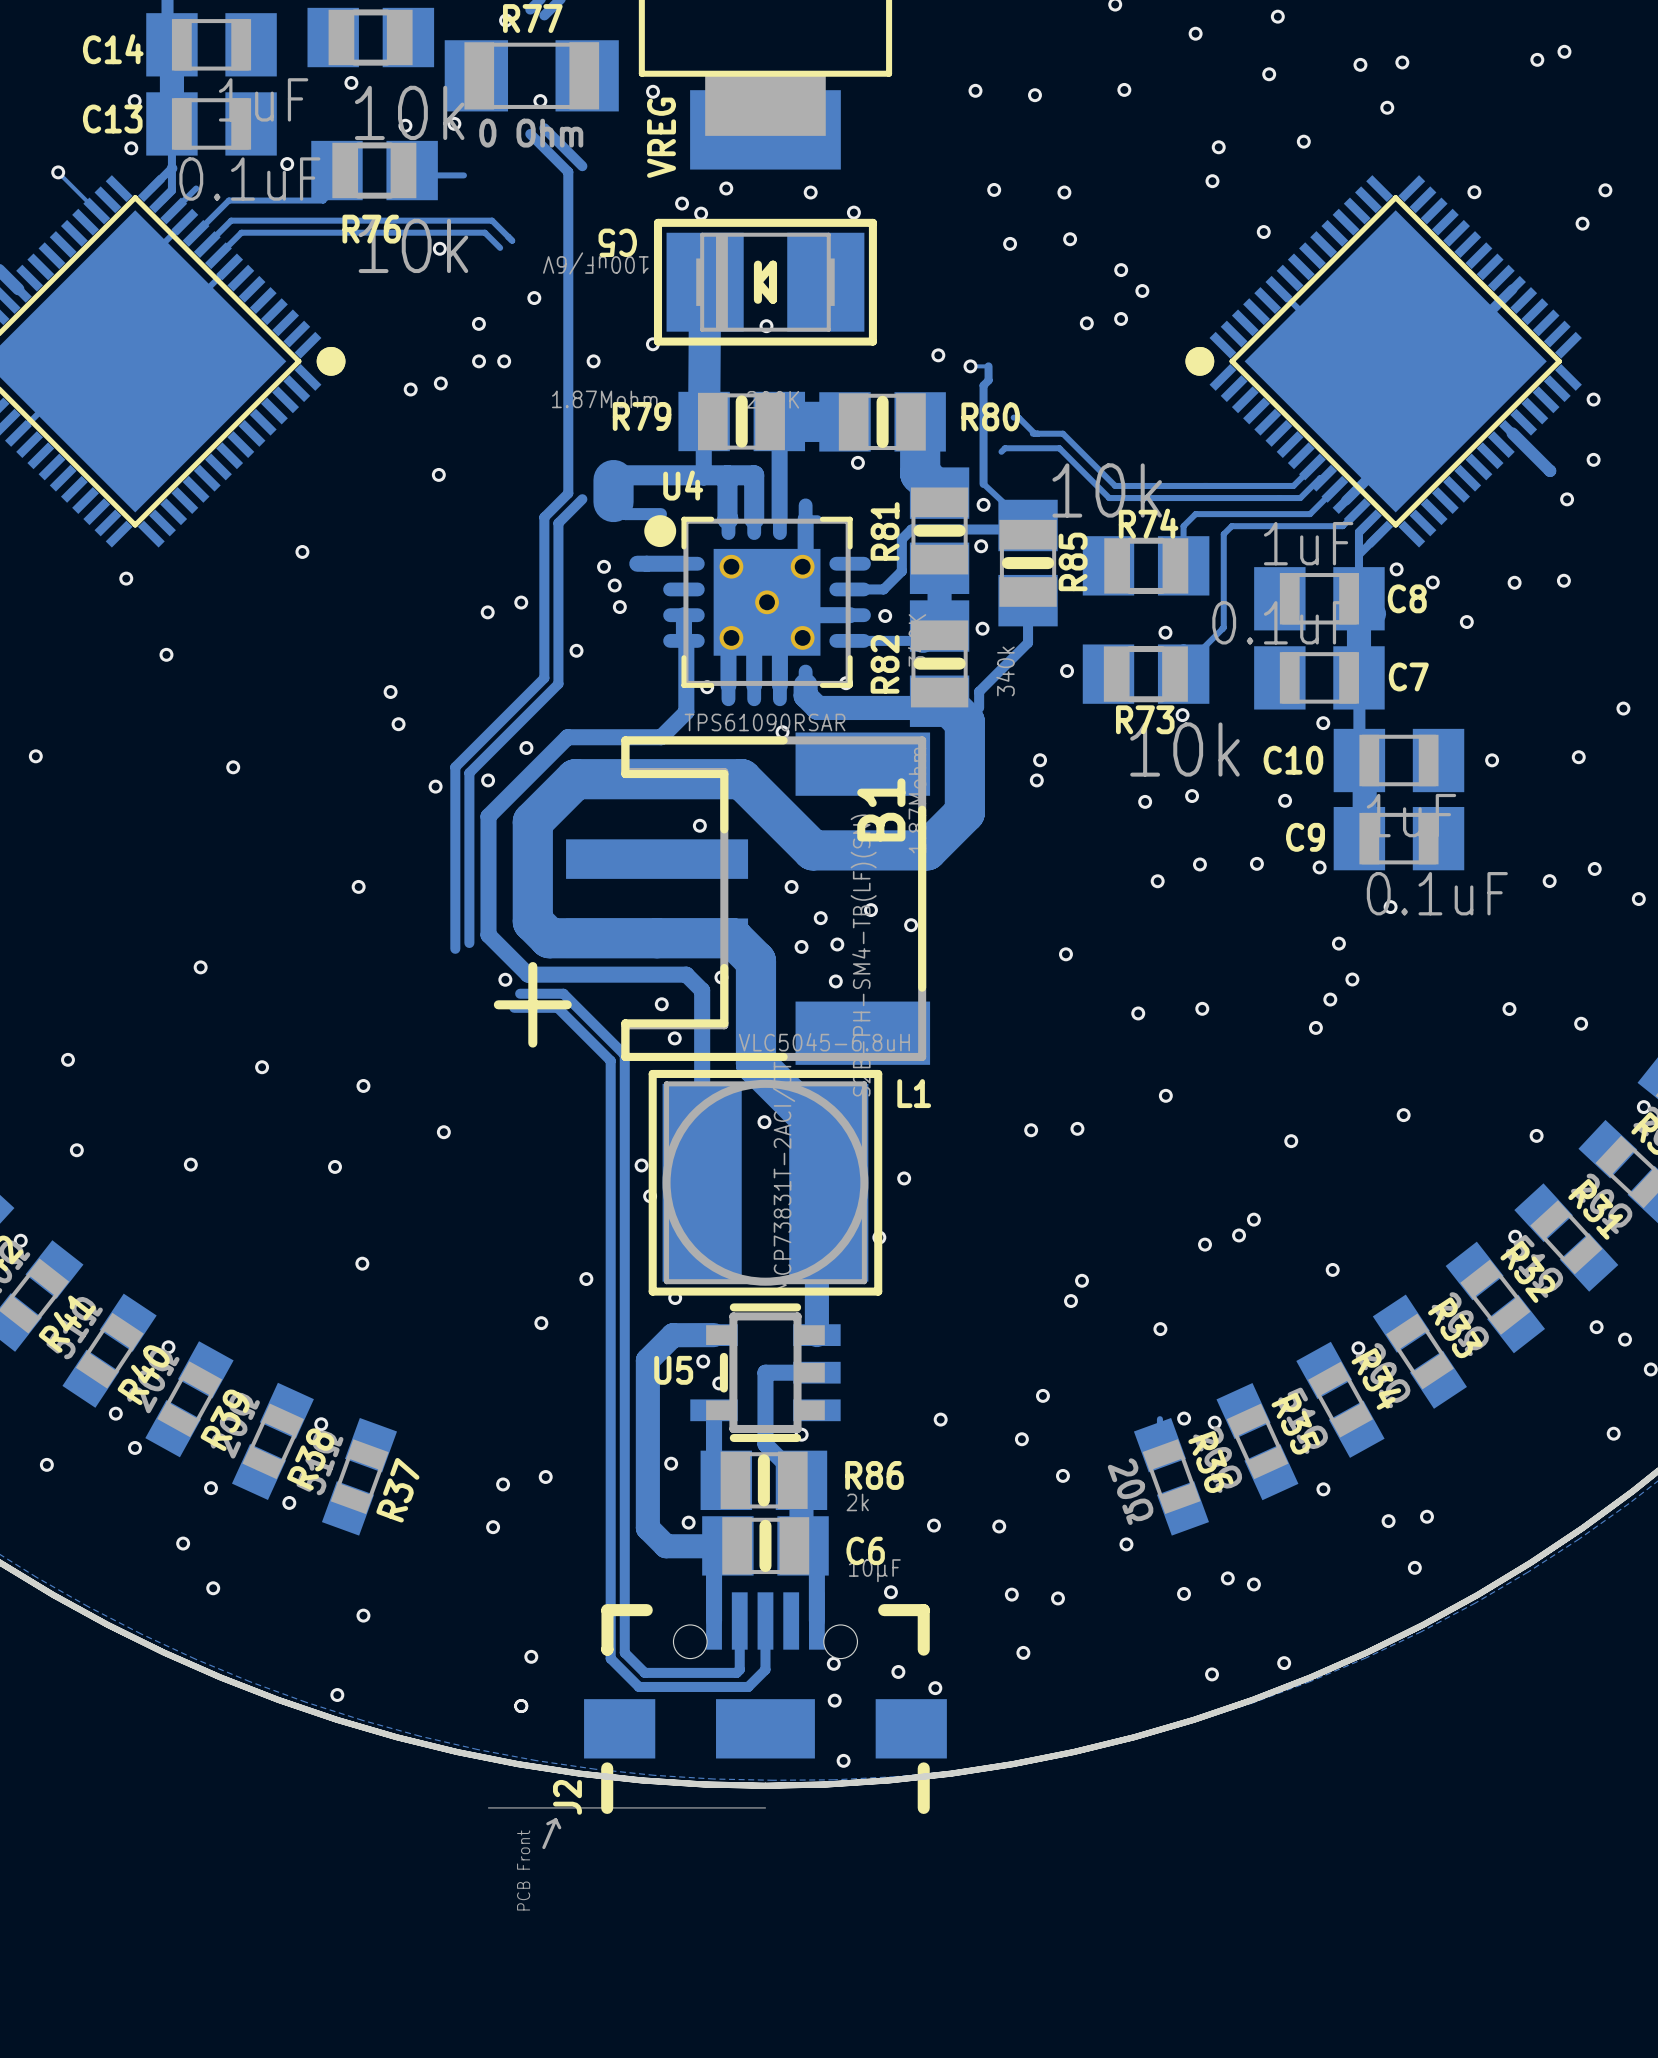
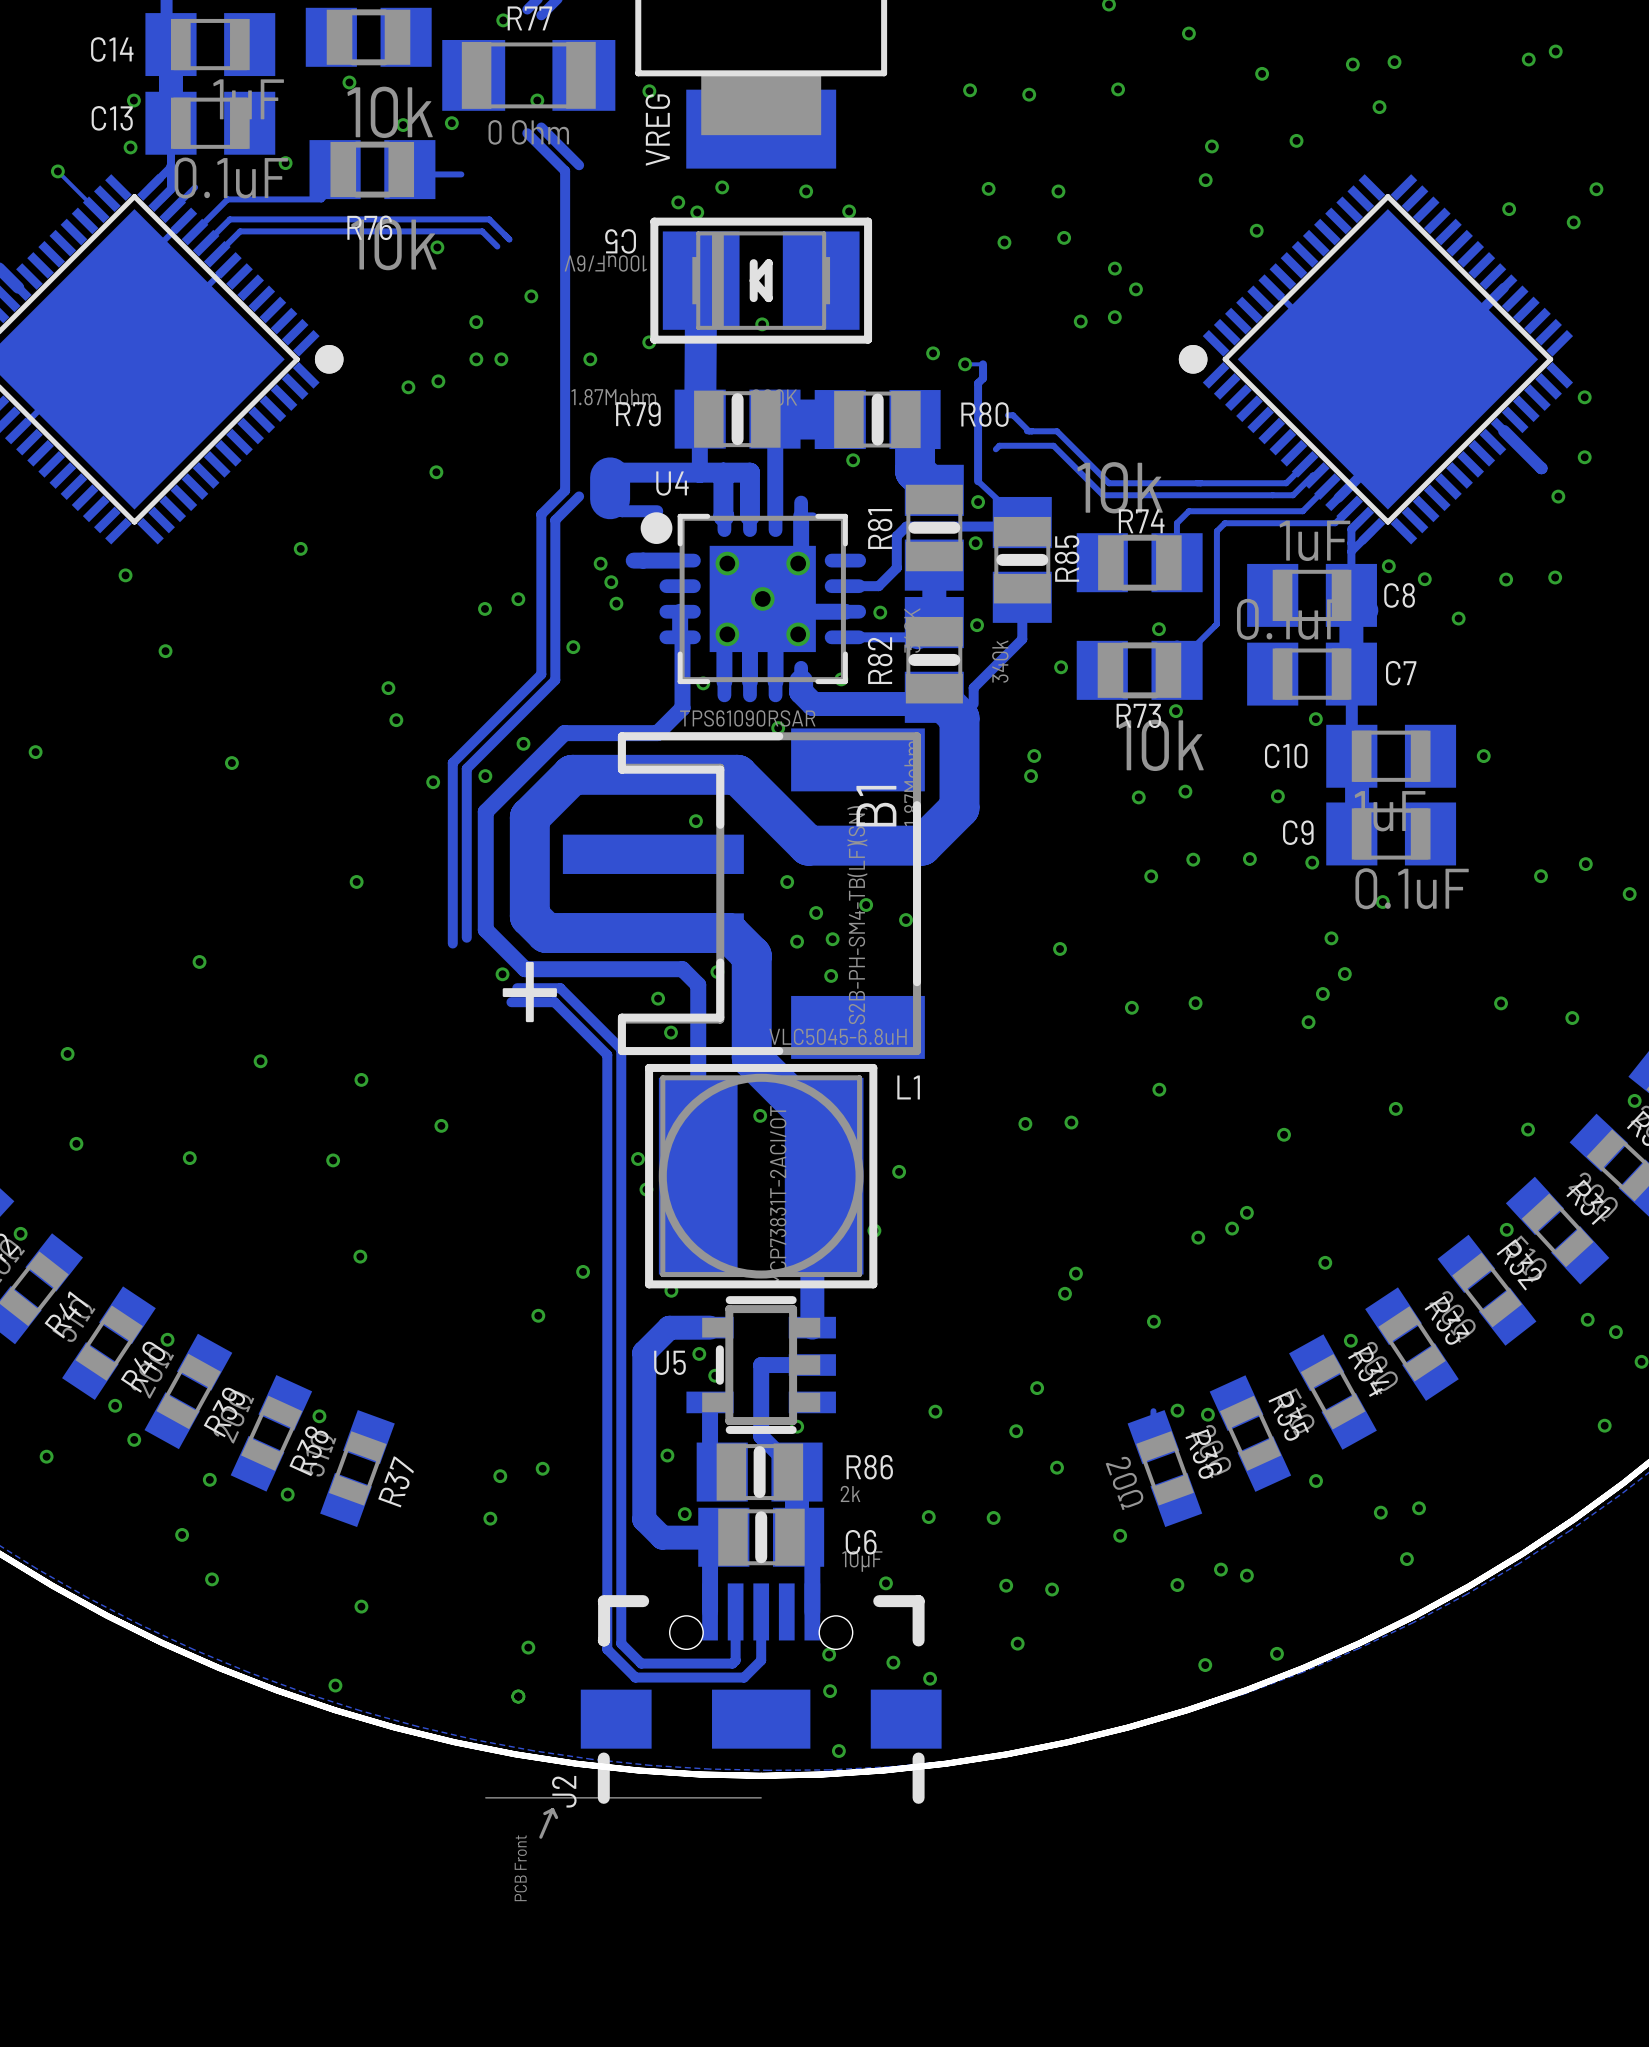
via: (1277, 16) -> none
via position: (1474, 192) -> (1509, 209)
via: (1623, 708) -> none
via: (1578, 757) -> none

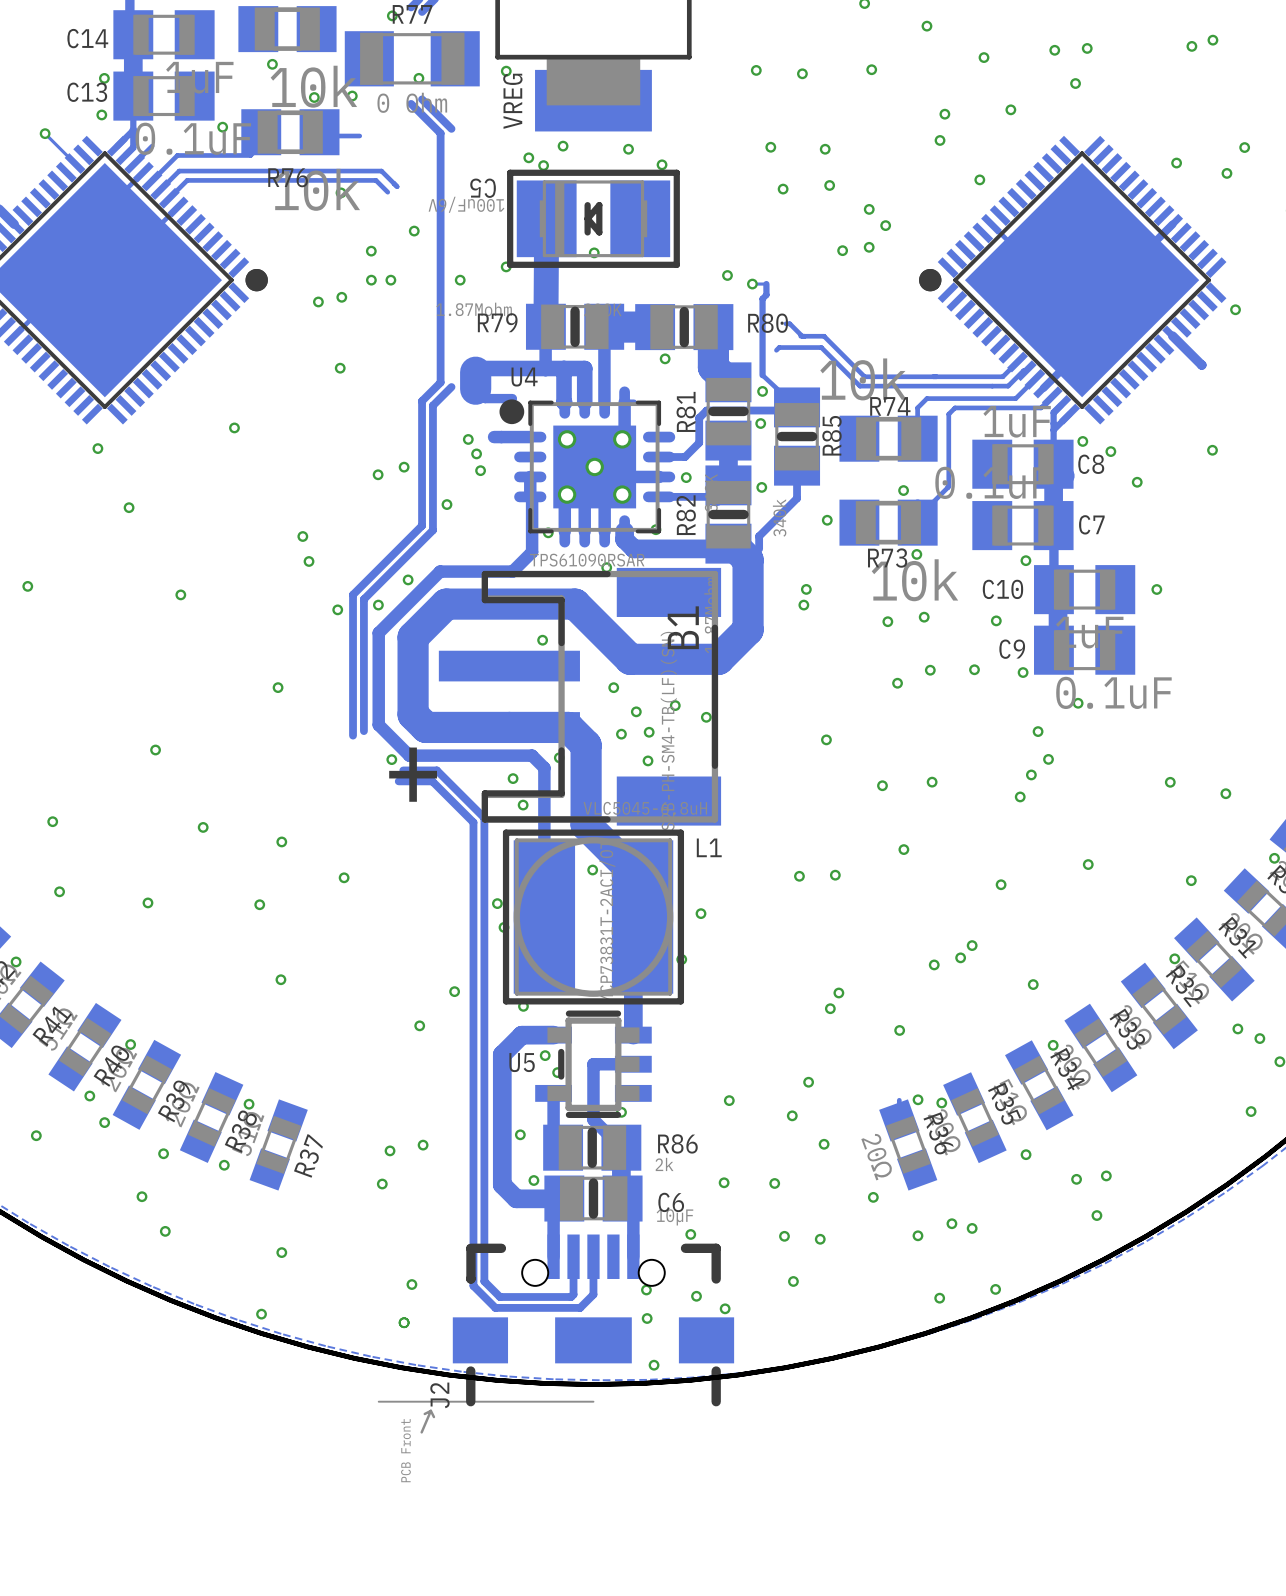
via: (1584, 457) -> none
via: (1558, 496) -> none
via: (1506, 579) -> none
via: (1585, 864) -> none
via: (1541, 876) -> none
via: (1629, 894) -> none

